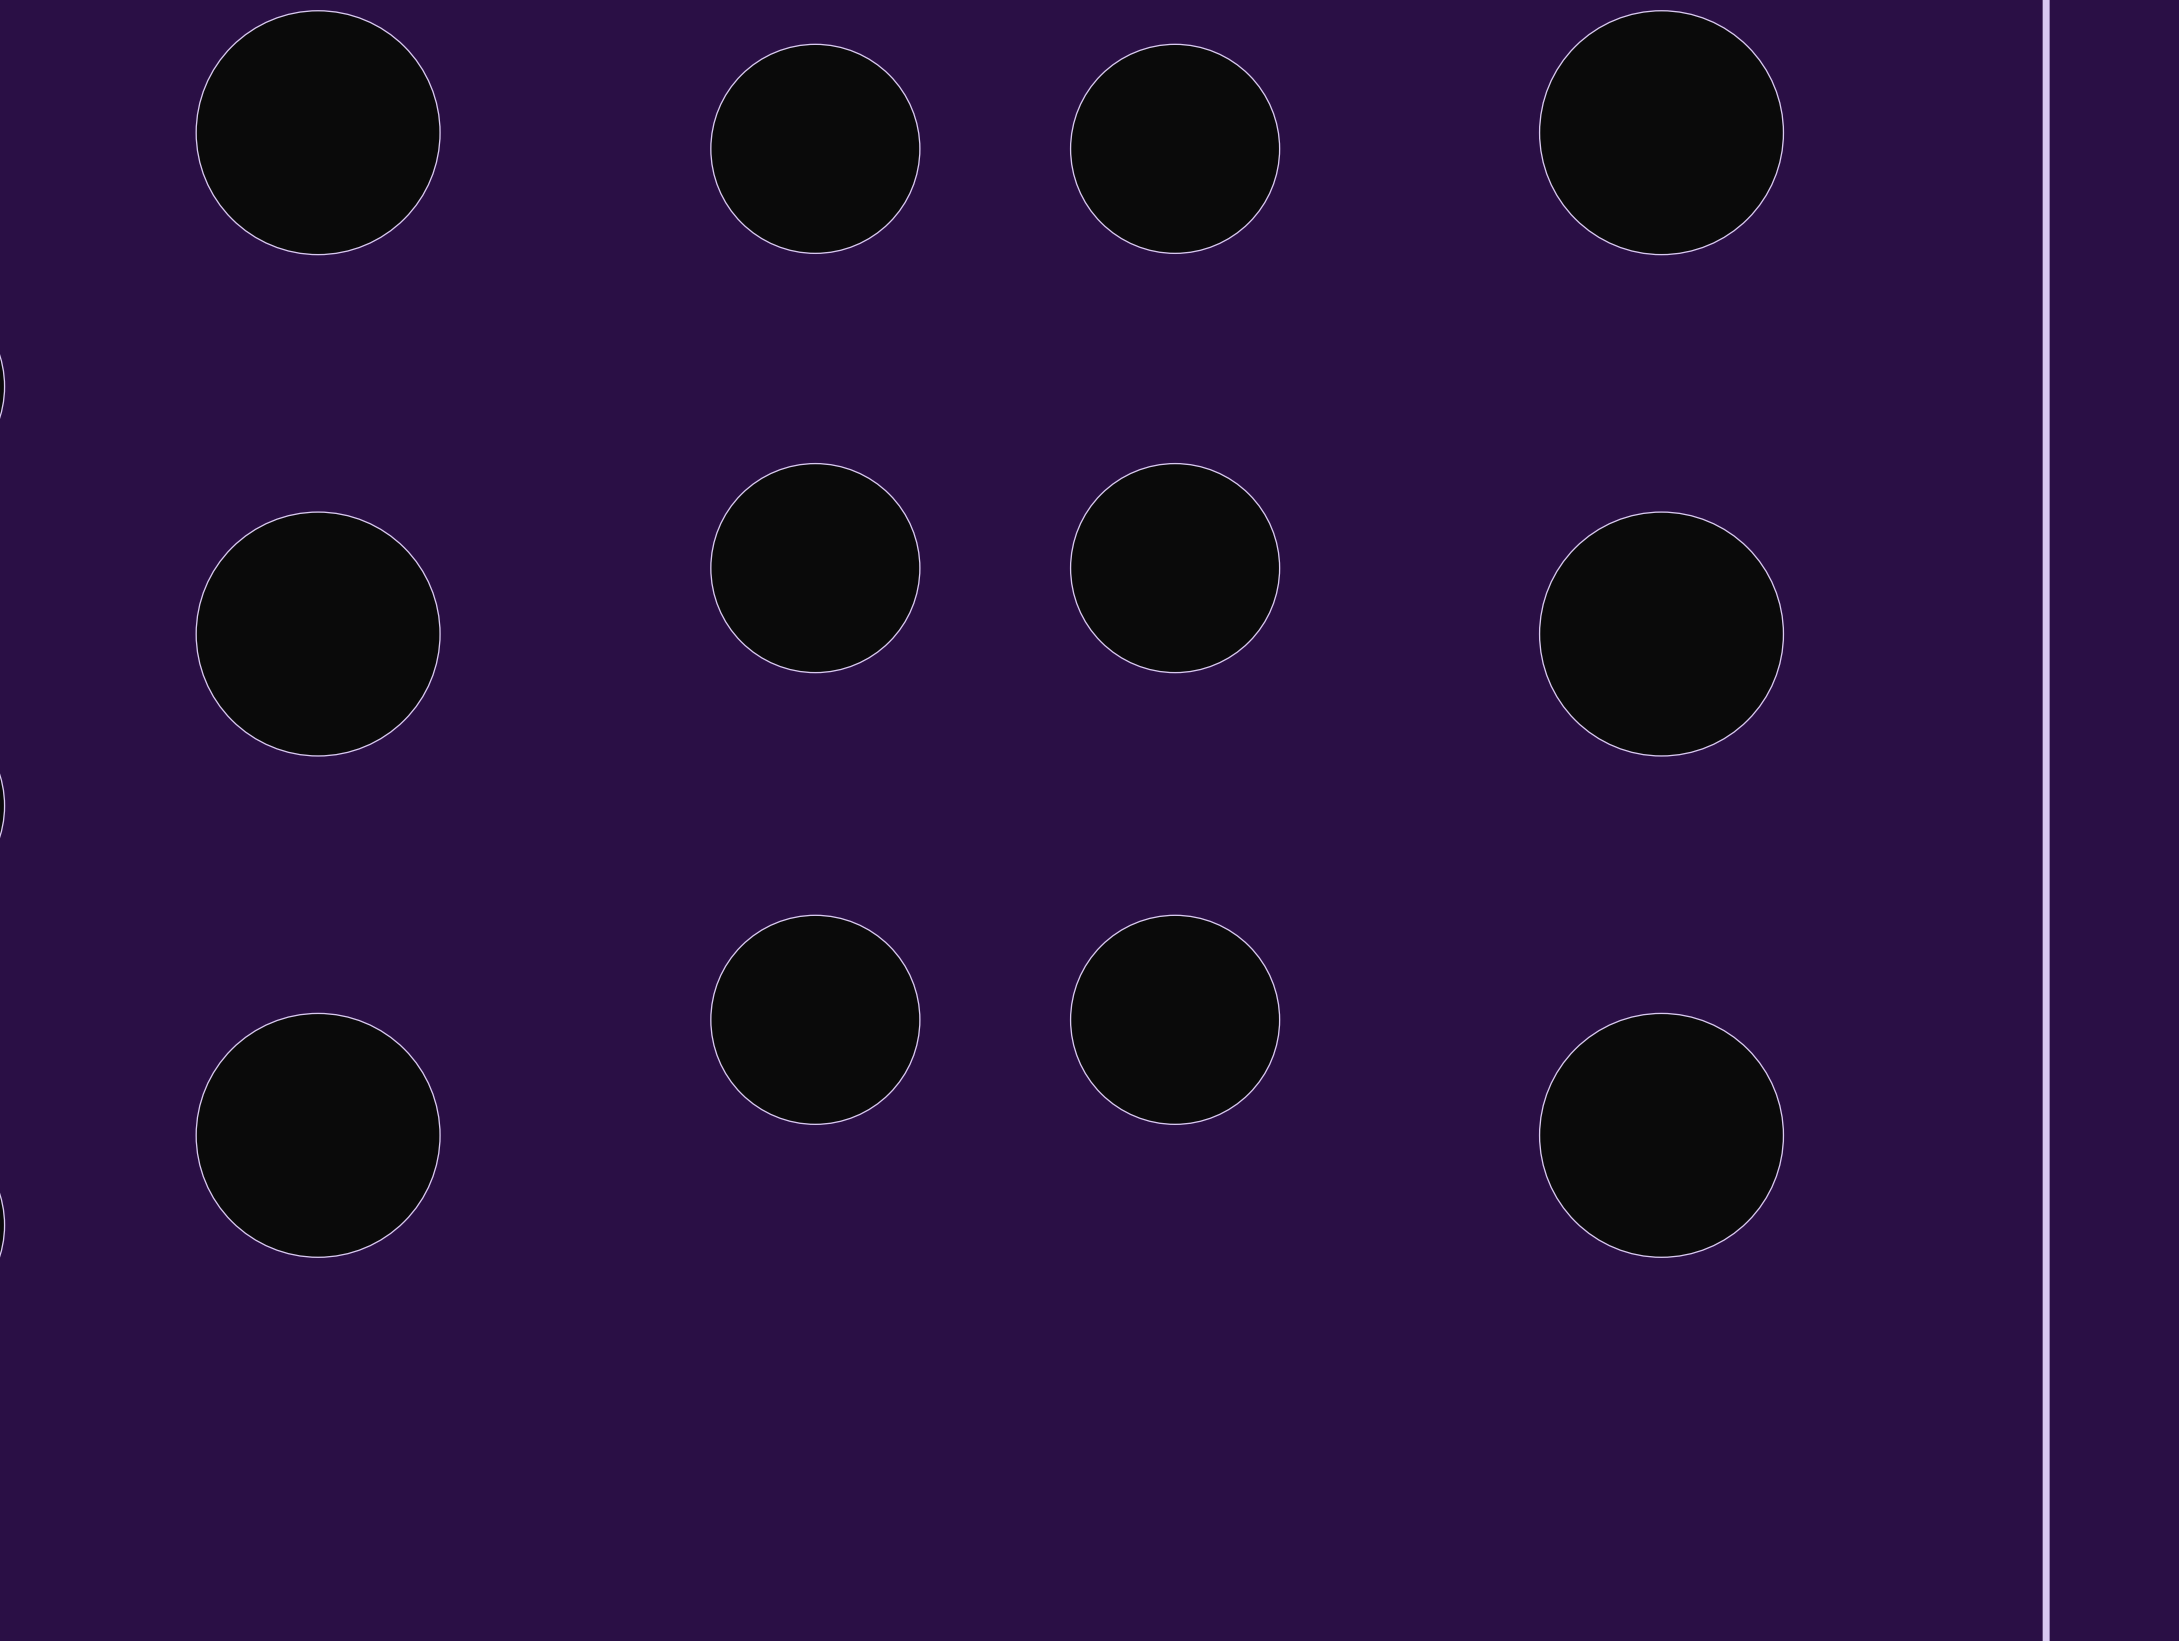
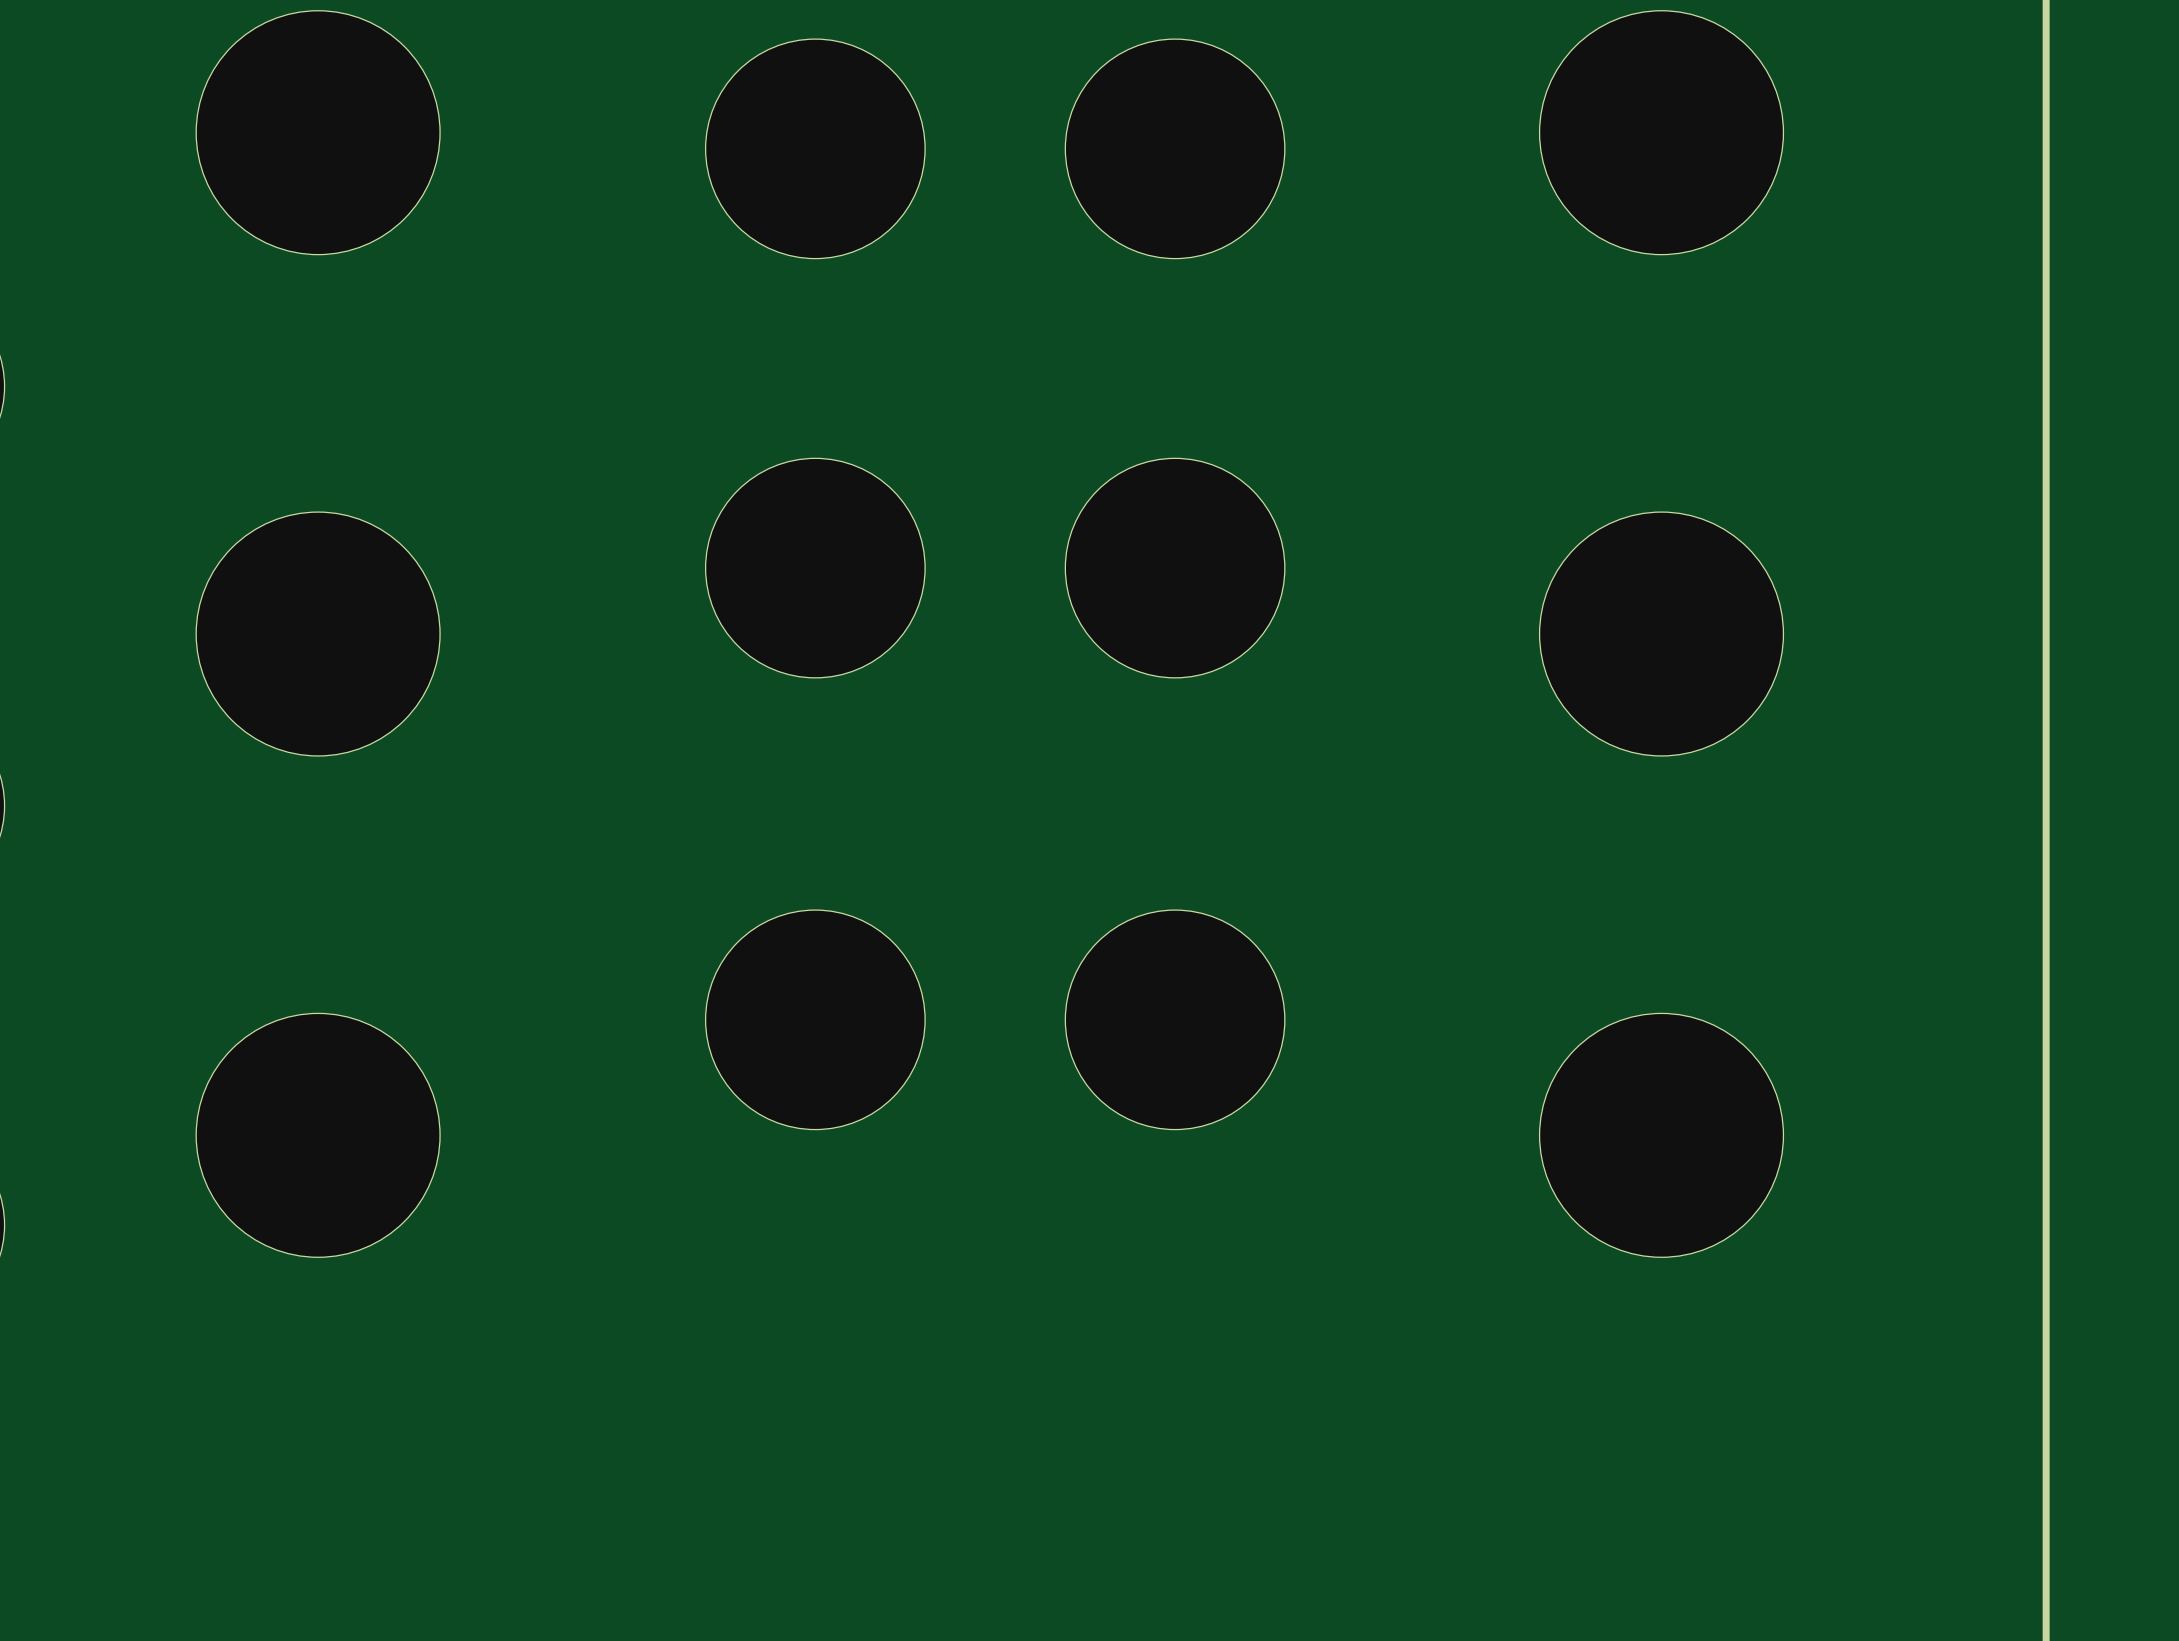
part footprint: [710, 44, 920, 254] -> [705, 39, 926, 259]
part footprint: [1070, 44, 1280, 254] -> [1065, 39, 1285, 259]
part footprint: [710, 463, 920, 673] -> [705, 458, 926, 678]
part footprint: [1070, 463, 1280, 673] -> [1065, 458, 1285, 678]
part footprint: [710, 915, 920, 1125] -> [705, 910, 926, 1130]
part footprint: [1070, 915, 1280, 1125] -> [1065, 910, 1285, 1130]

